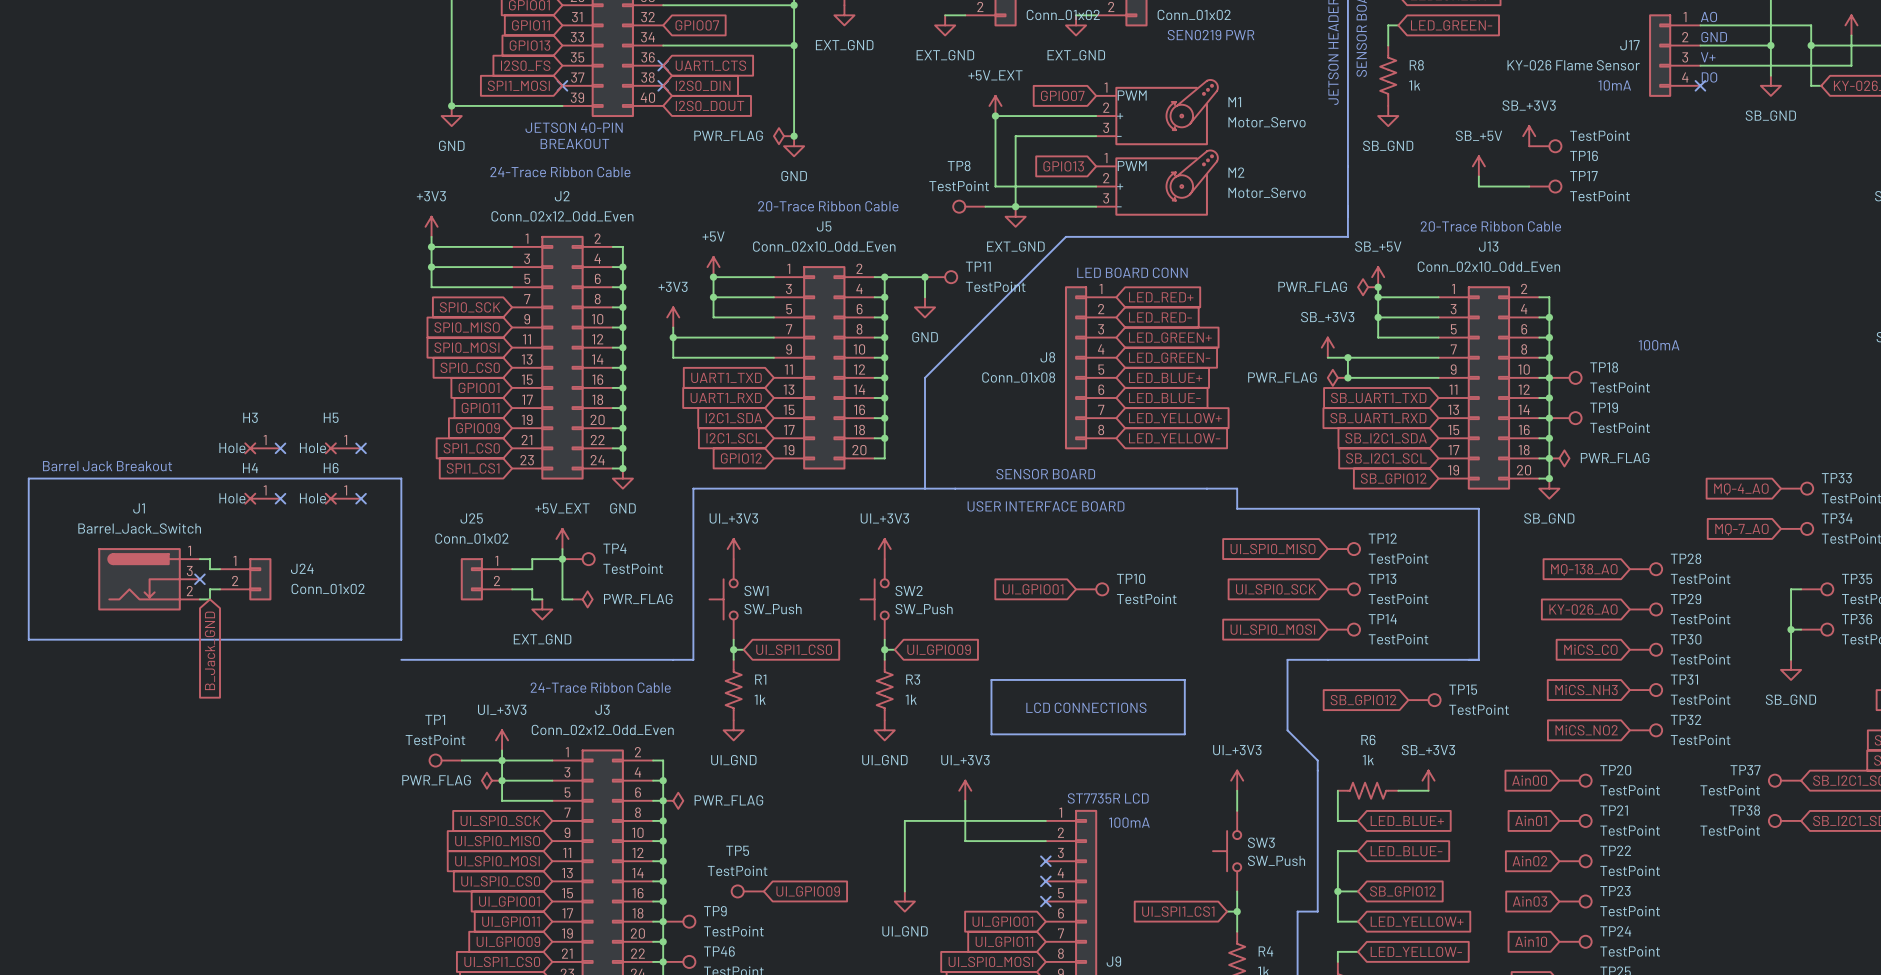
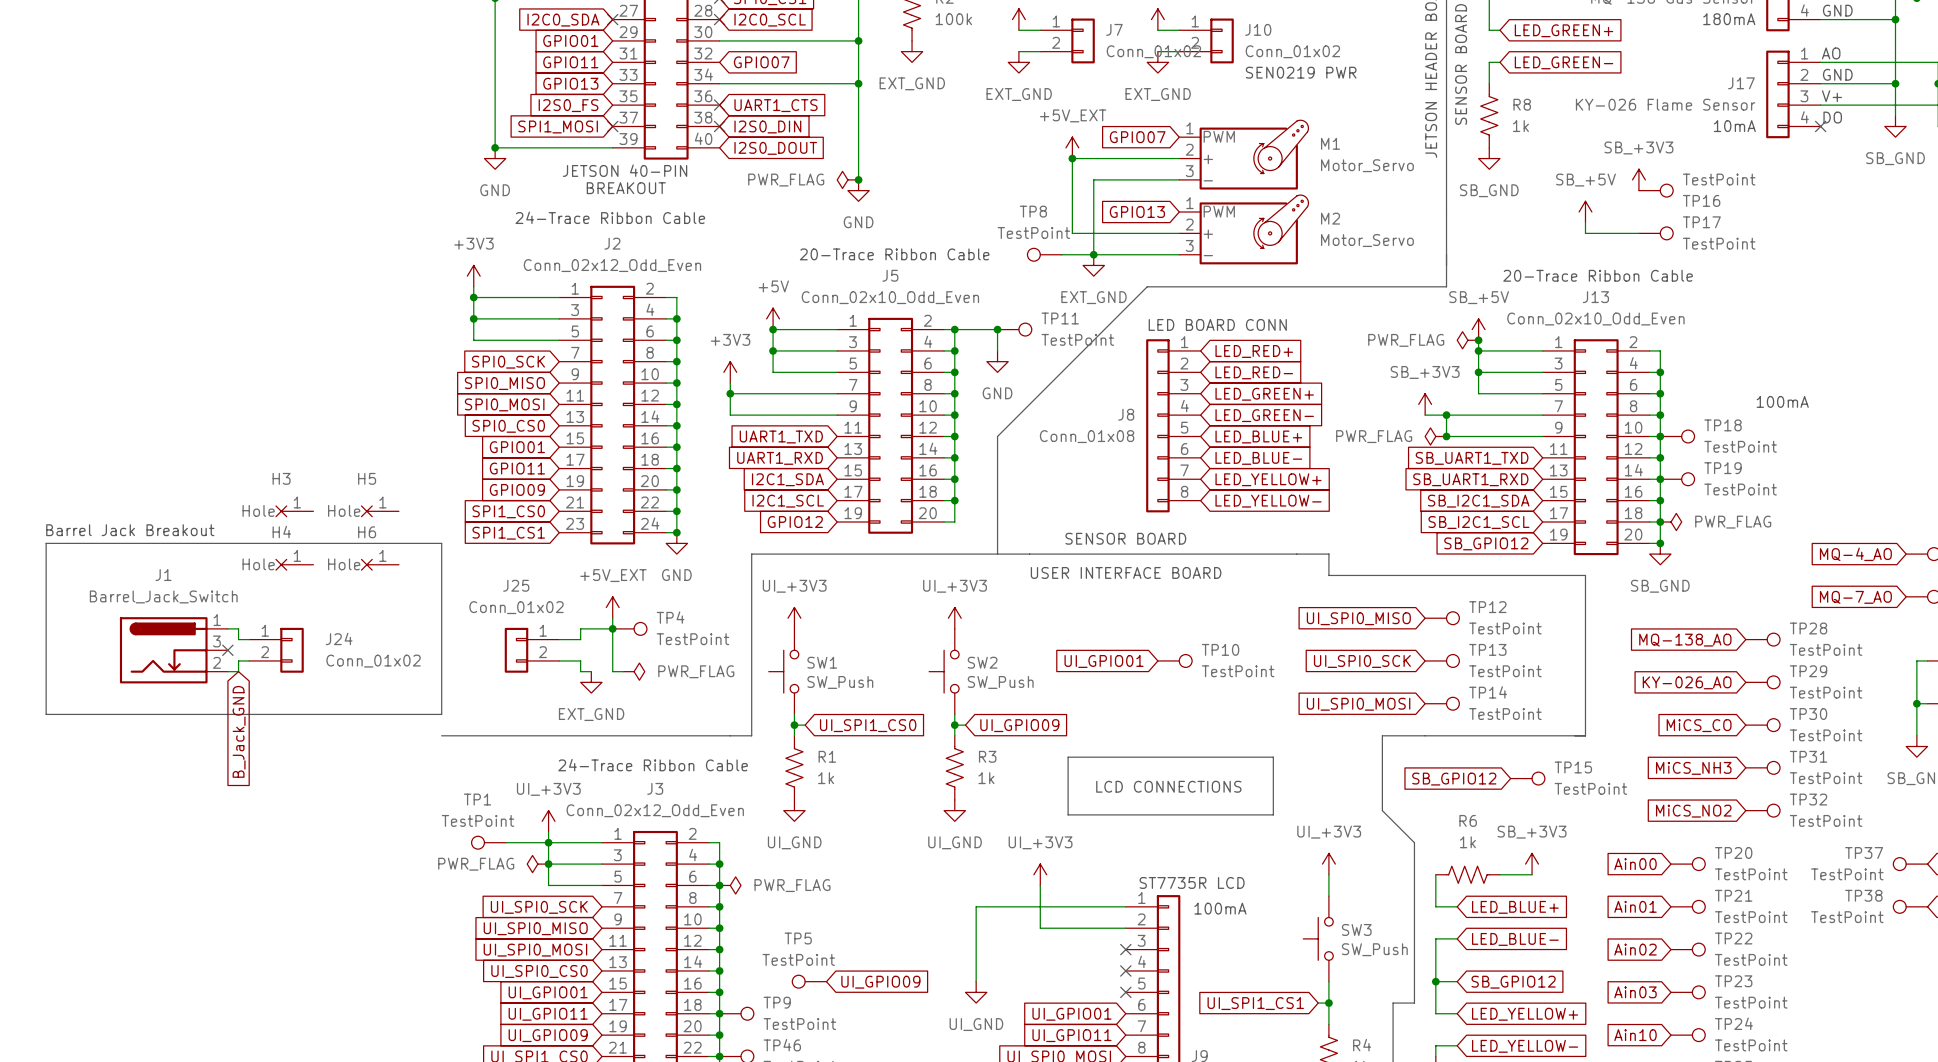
no-connect mark: (280, 448) -> none
no-connect mark: (361, 448) -> none
no-connect mark: (280, 498) -> none
no-connect mark: (361, 498) -> none

